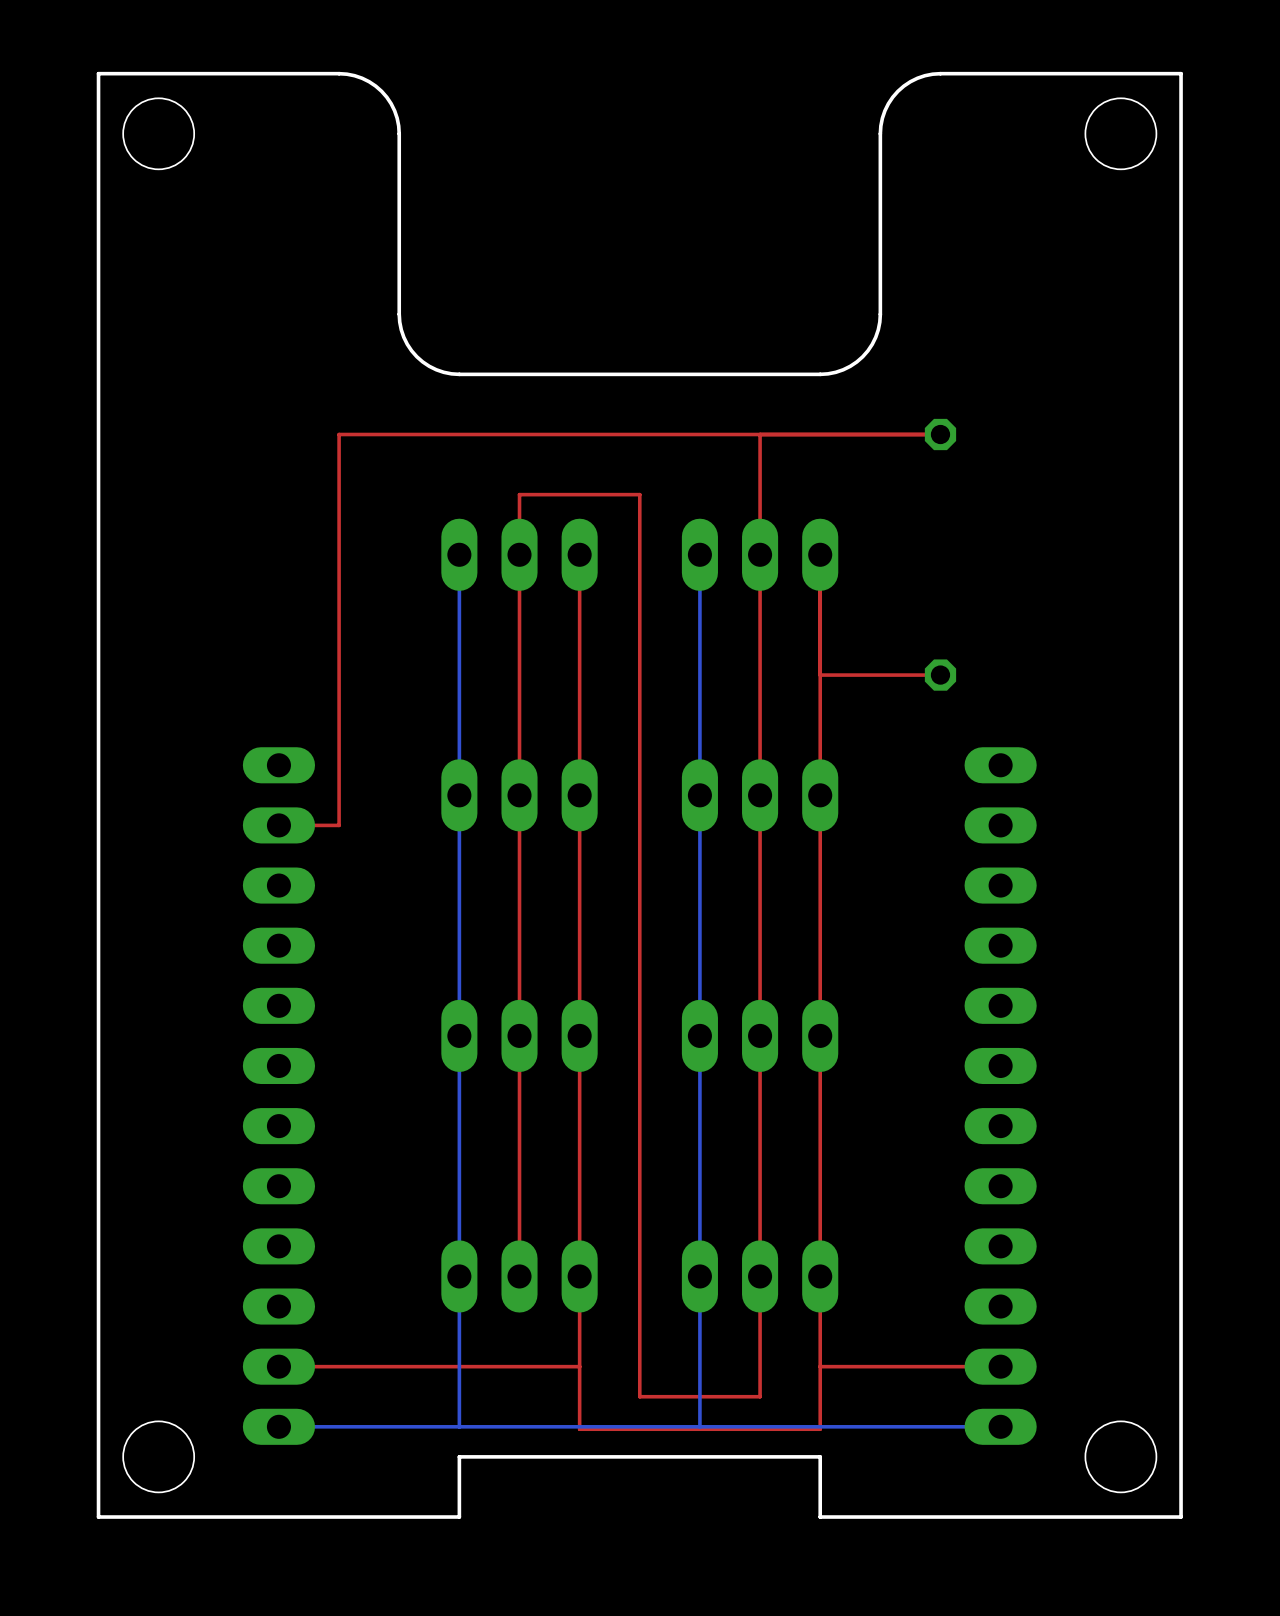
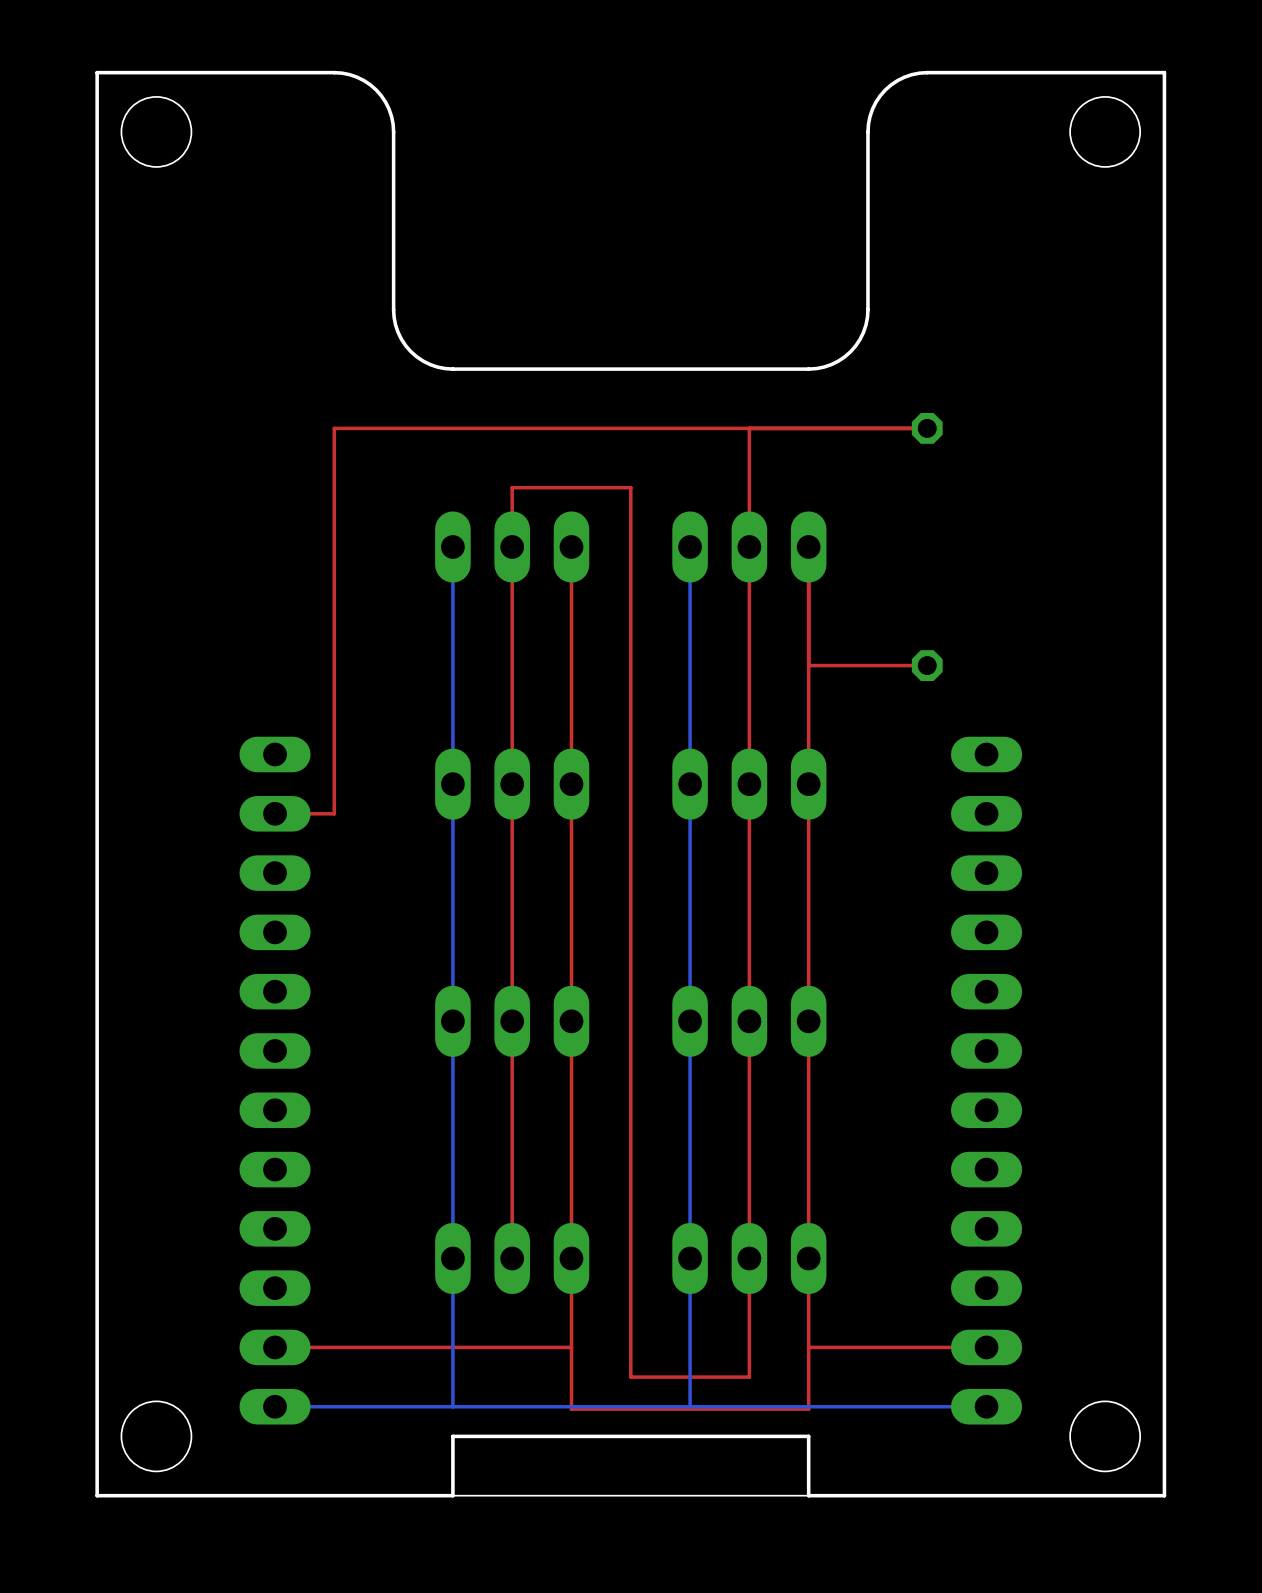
board edge: none -> (808, 1495) (452, 1495)

